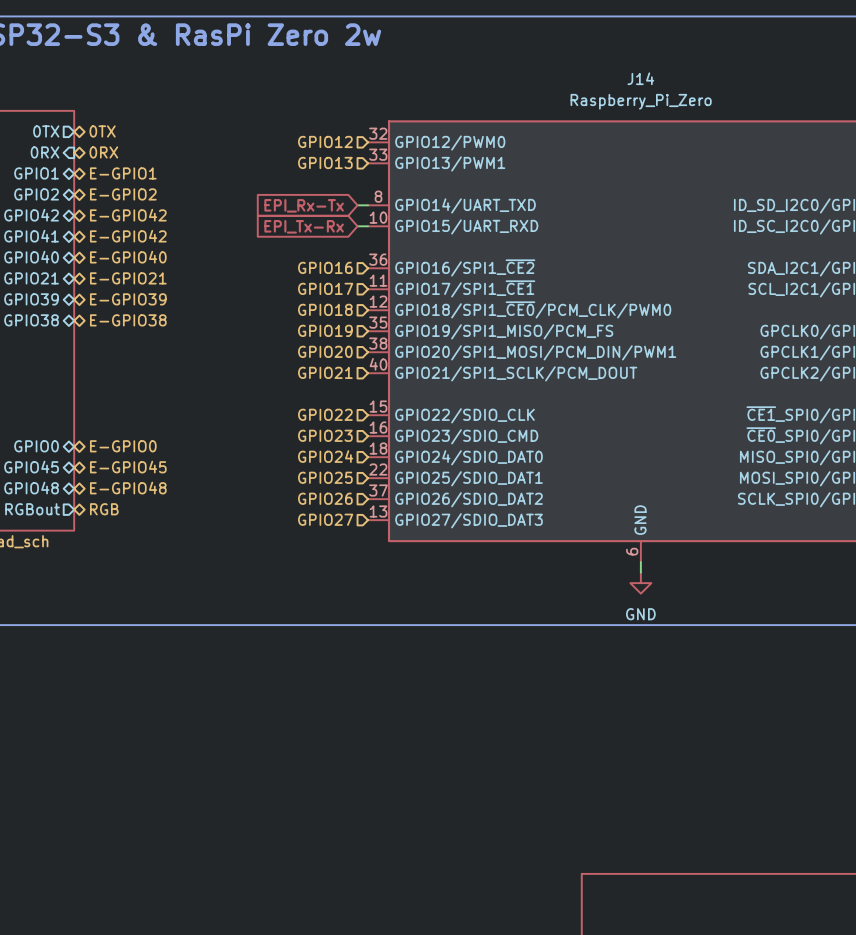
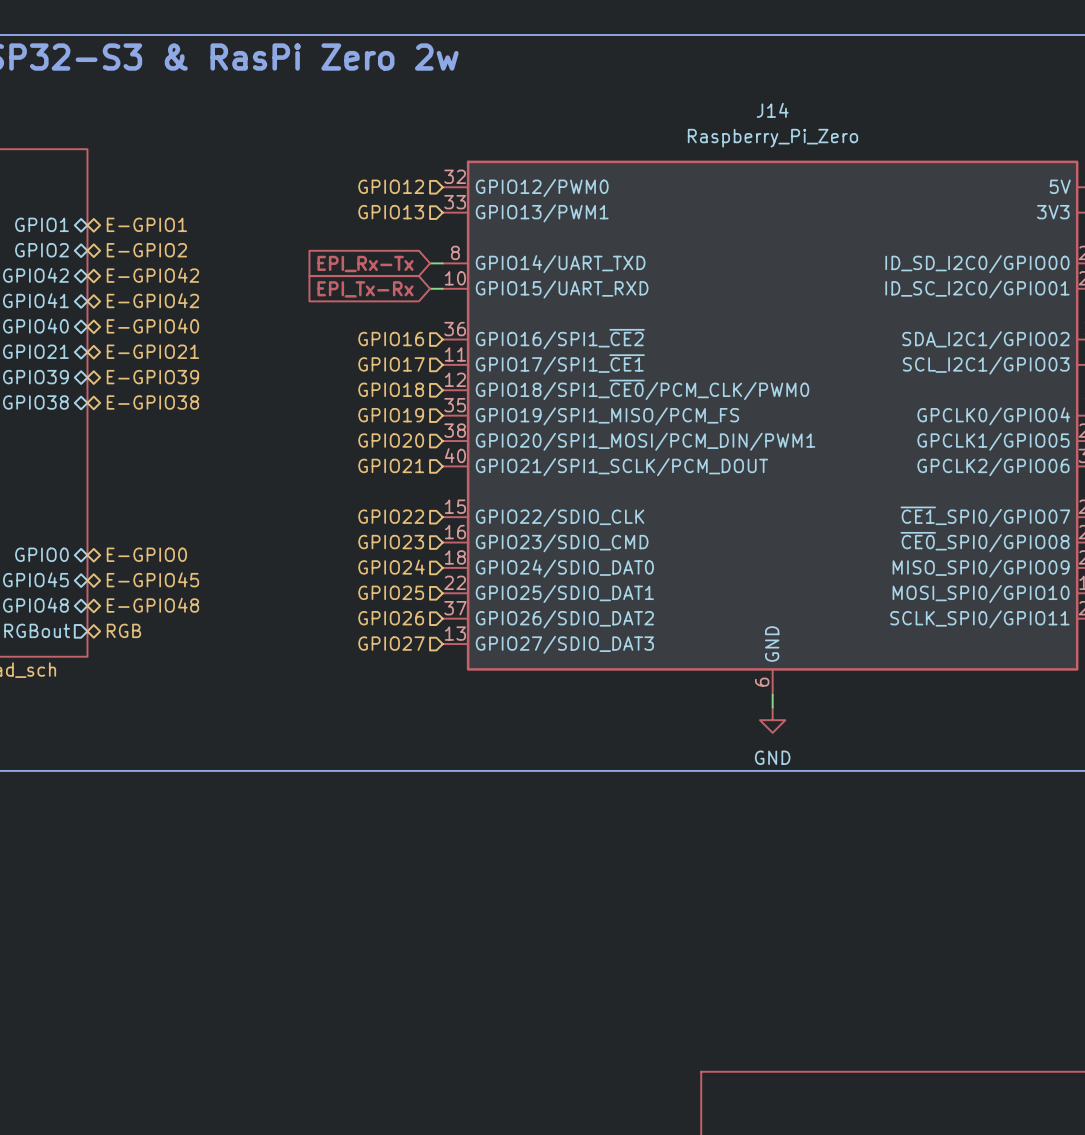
sheet pin: 0TX (46, 131) -> none
hierarchical label: 0TX (102, 131) -> none
sheet pin: 0RX (45, 152) -> none
hierarchical label: 0RX (103, 152) -> none

